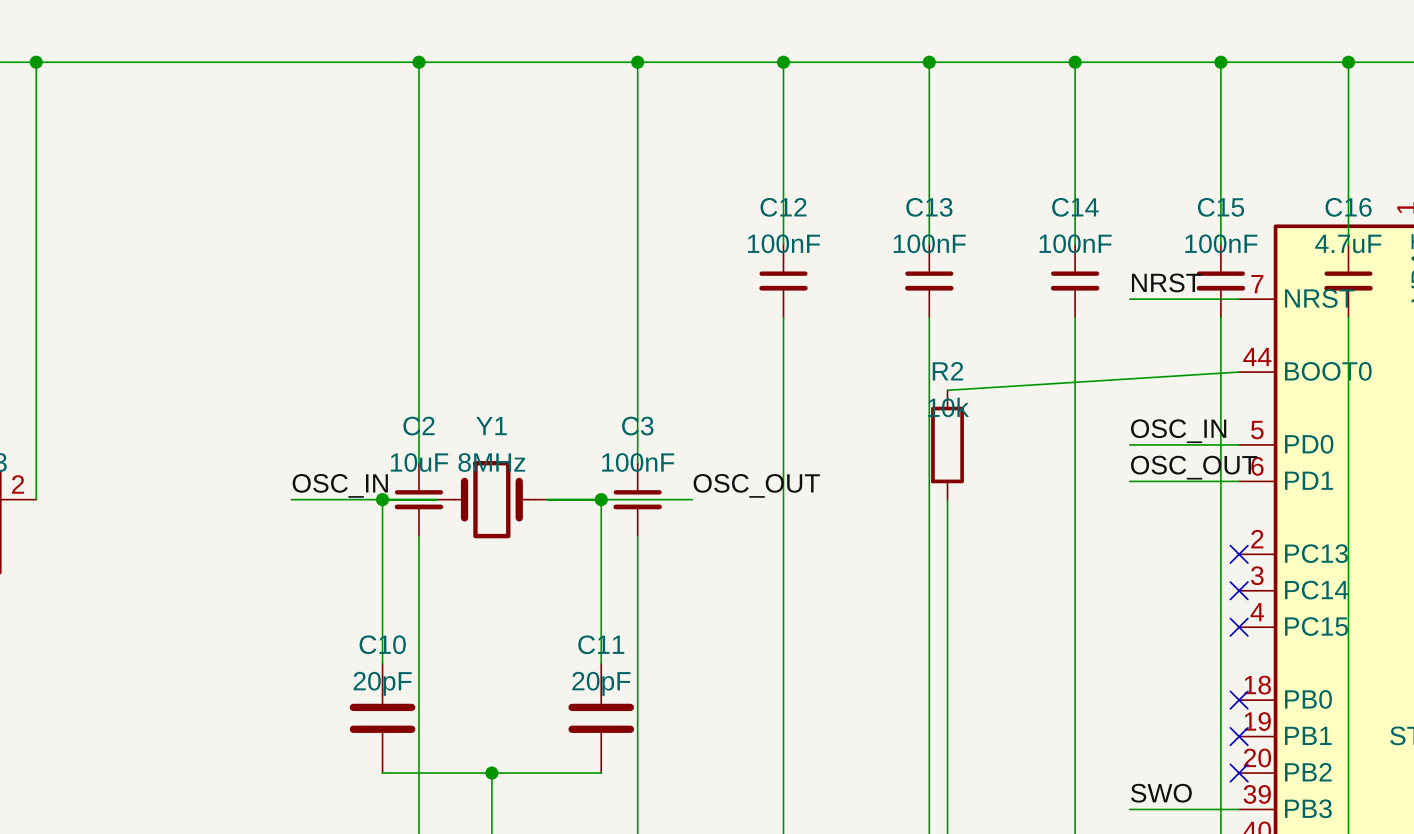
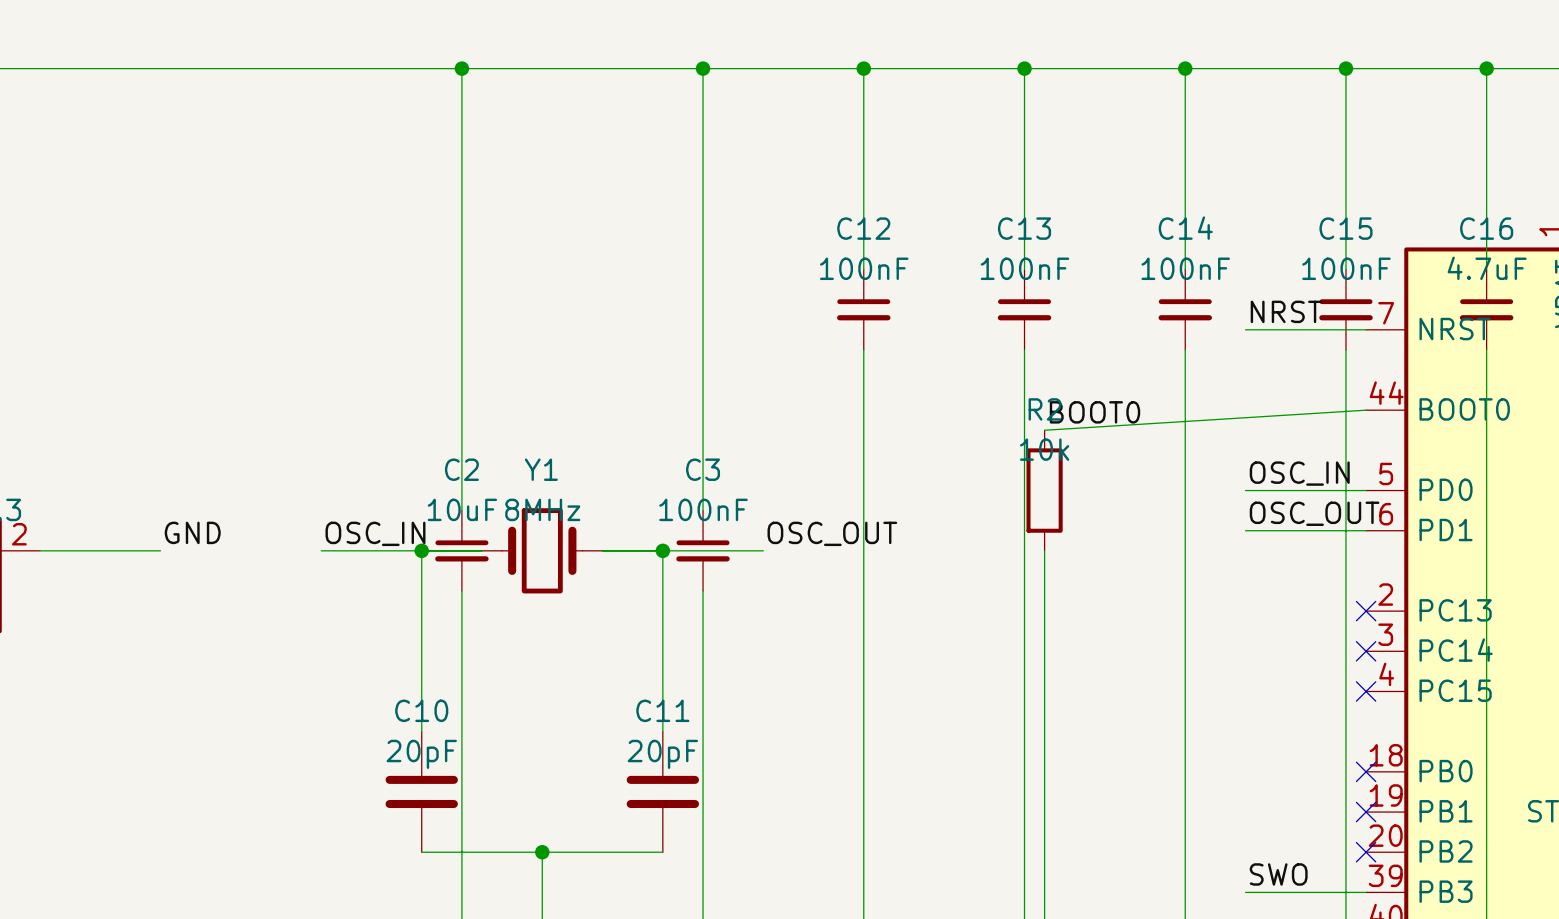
wire: (36, 62) (36, 499) -> (160, 550) (39, 550)
junction: (36, 62) -> none
label: none -> BOOT0 (1094, 412)
label: none -> GND (192, 532)

